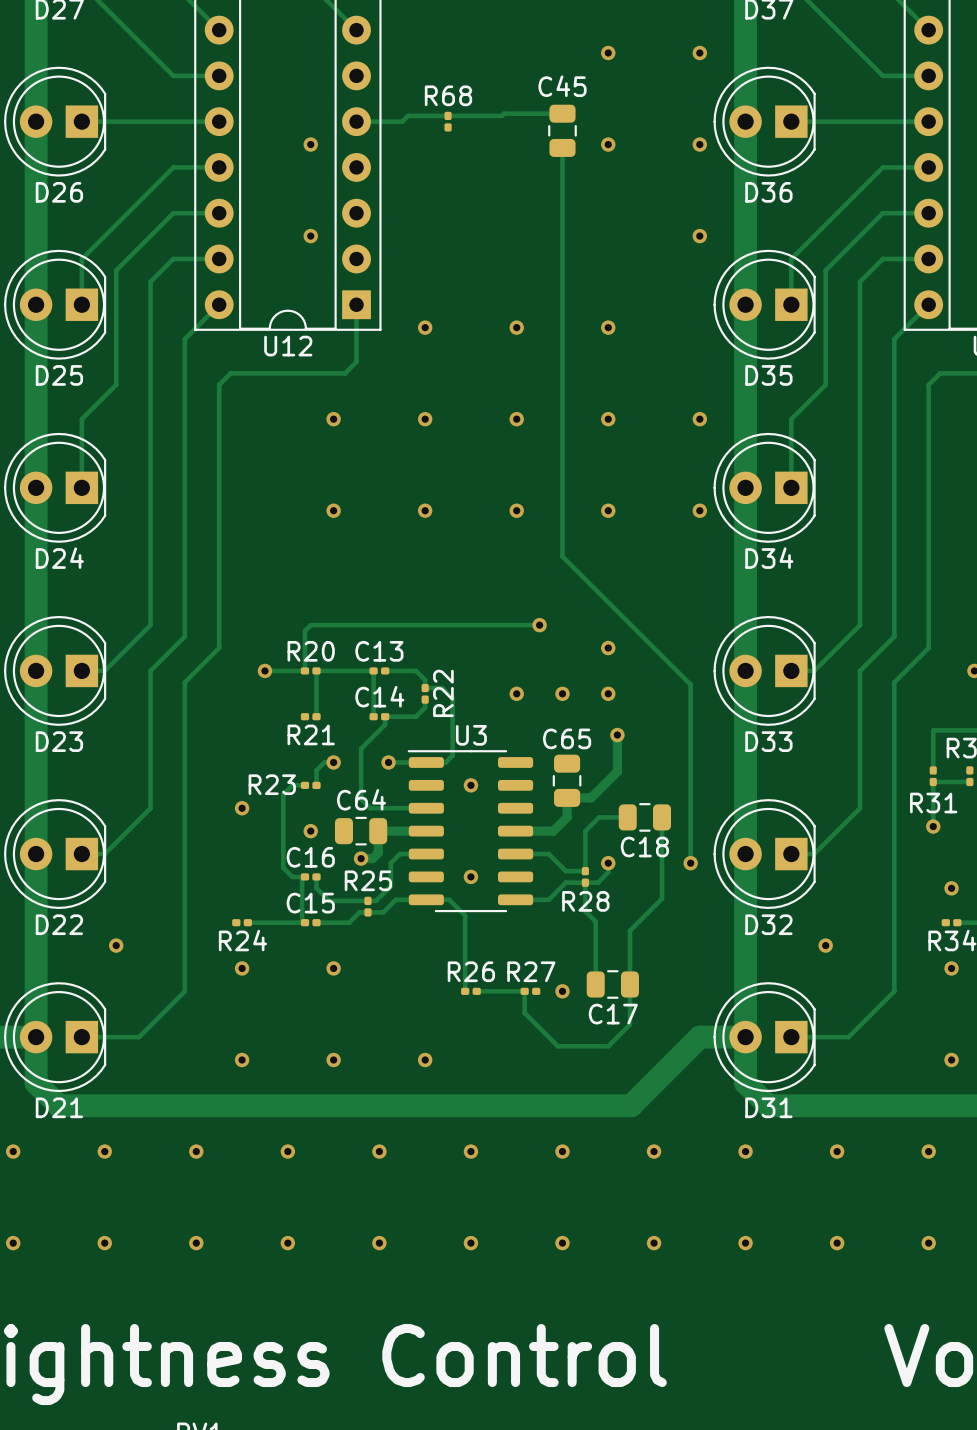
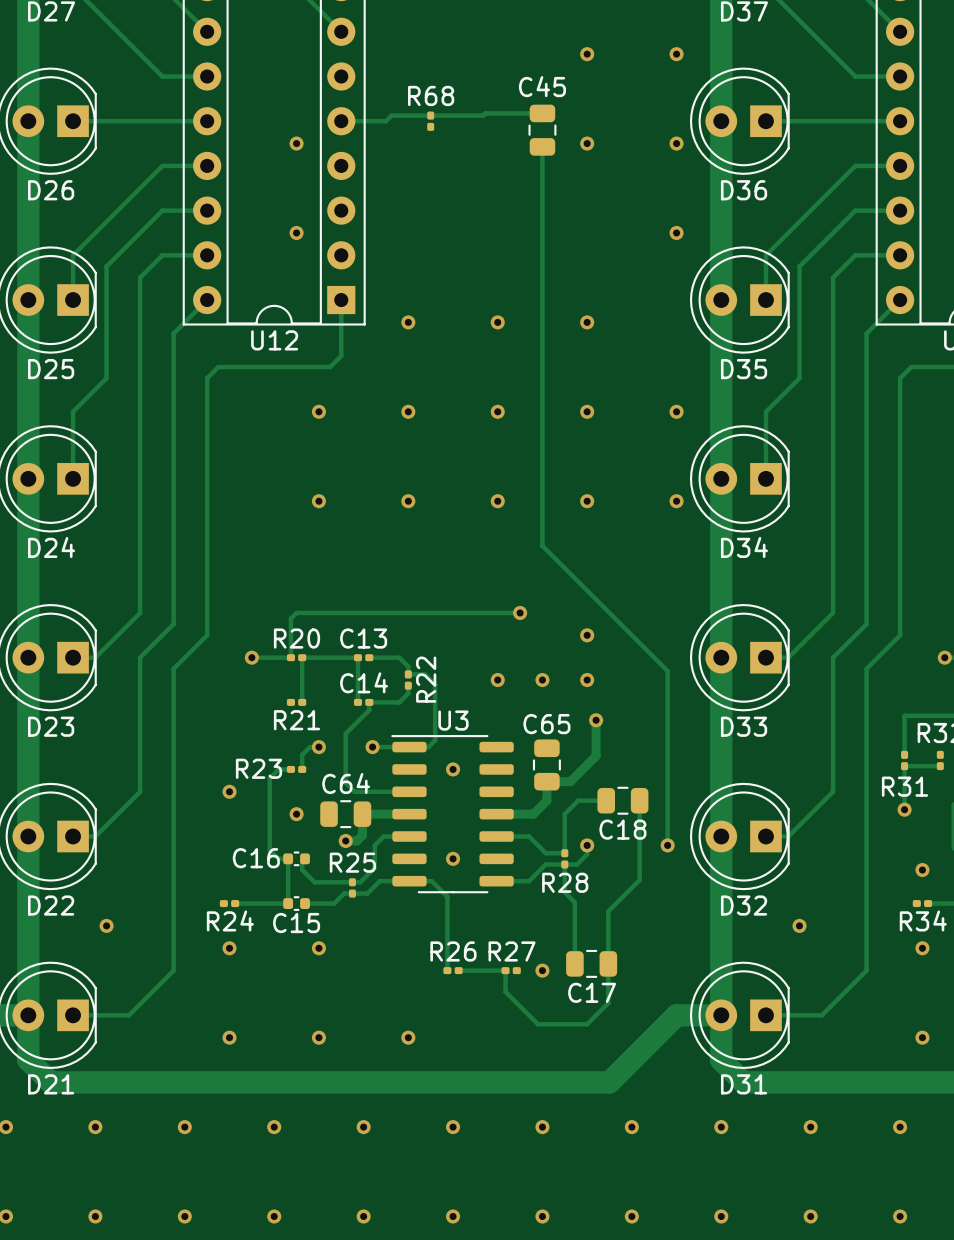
C16 name position: C16 (310, 857) -> C16 (256, 858)
C16 footprint: [300, 873, 321, 881] -> [283, 851, 310, 867]
C15 name position: C15 (310, 903) -> C15 (296, 923)
C15 footprint: [300, 919, 321, 927] -> [283, 896, 310, 911]

